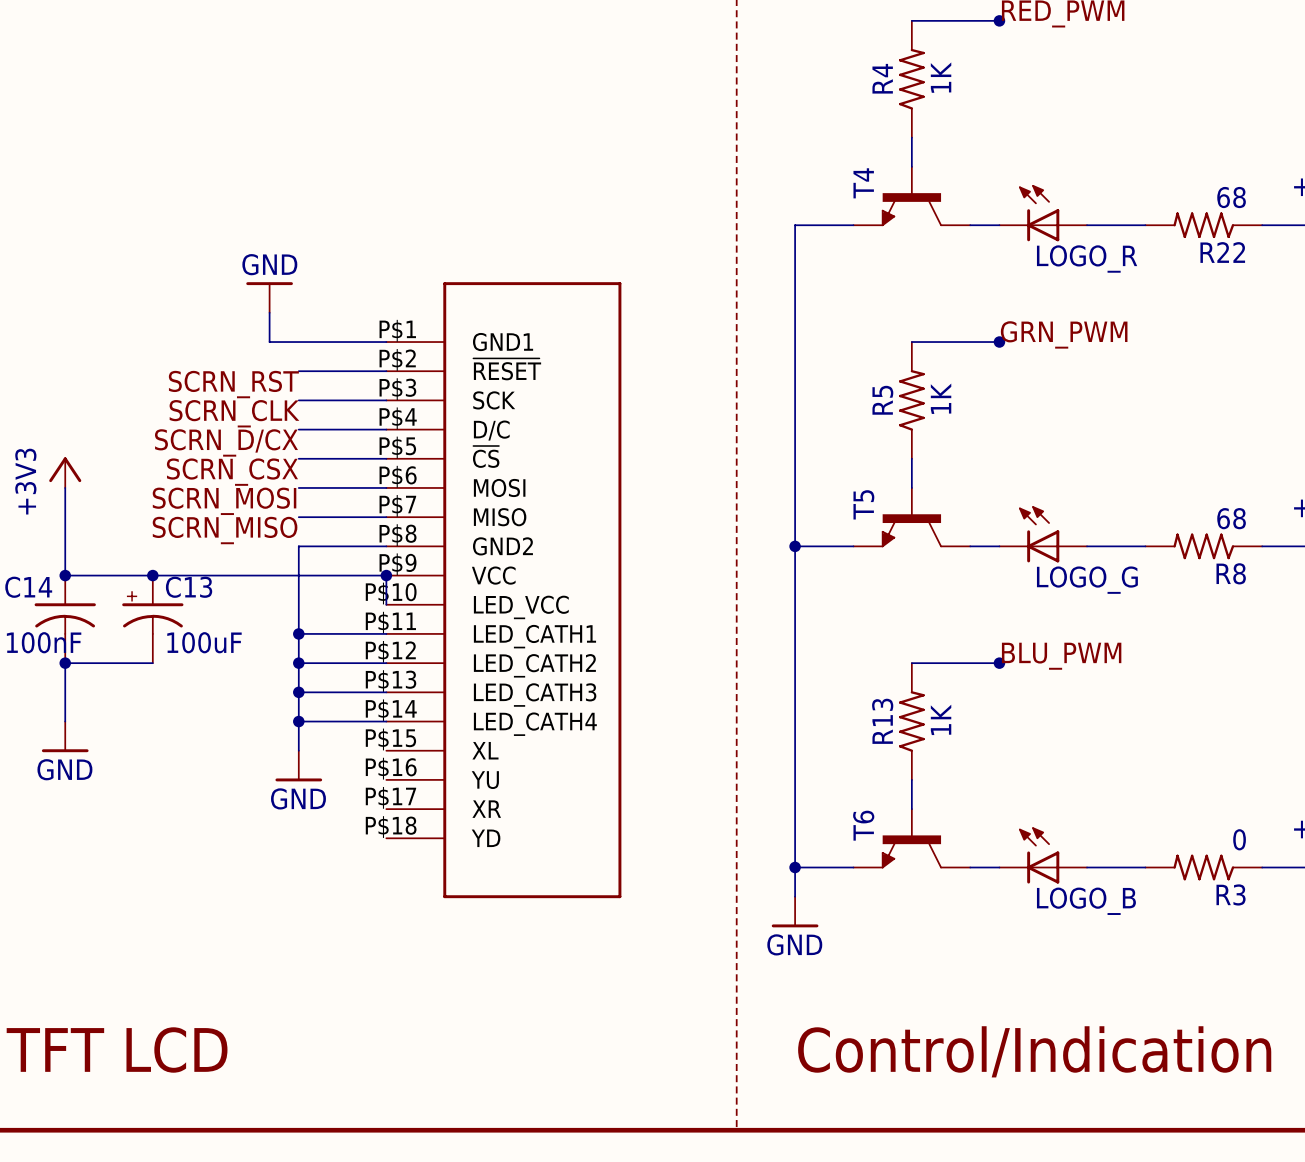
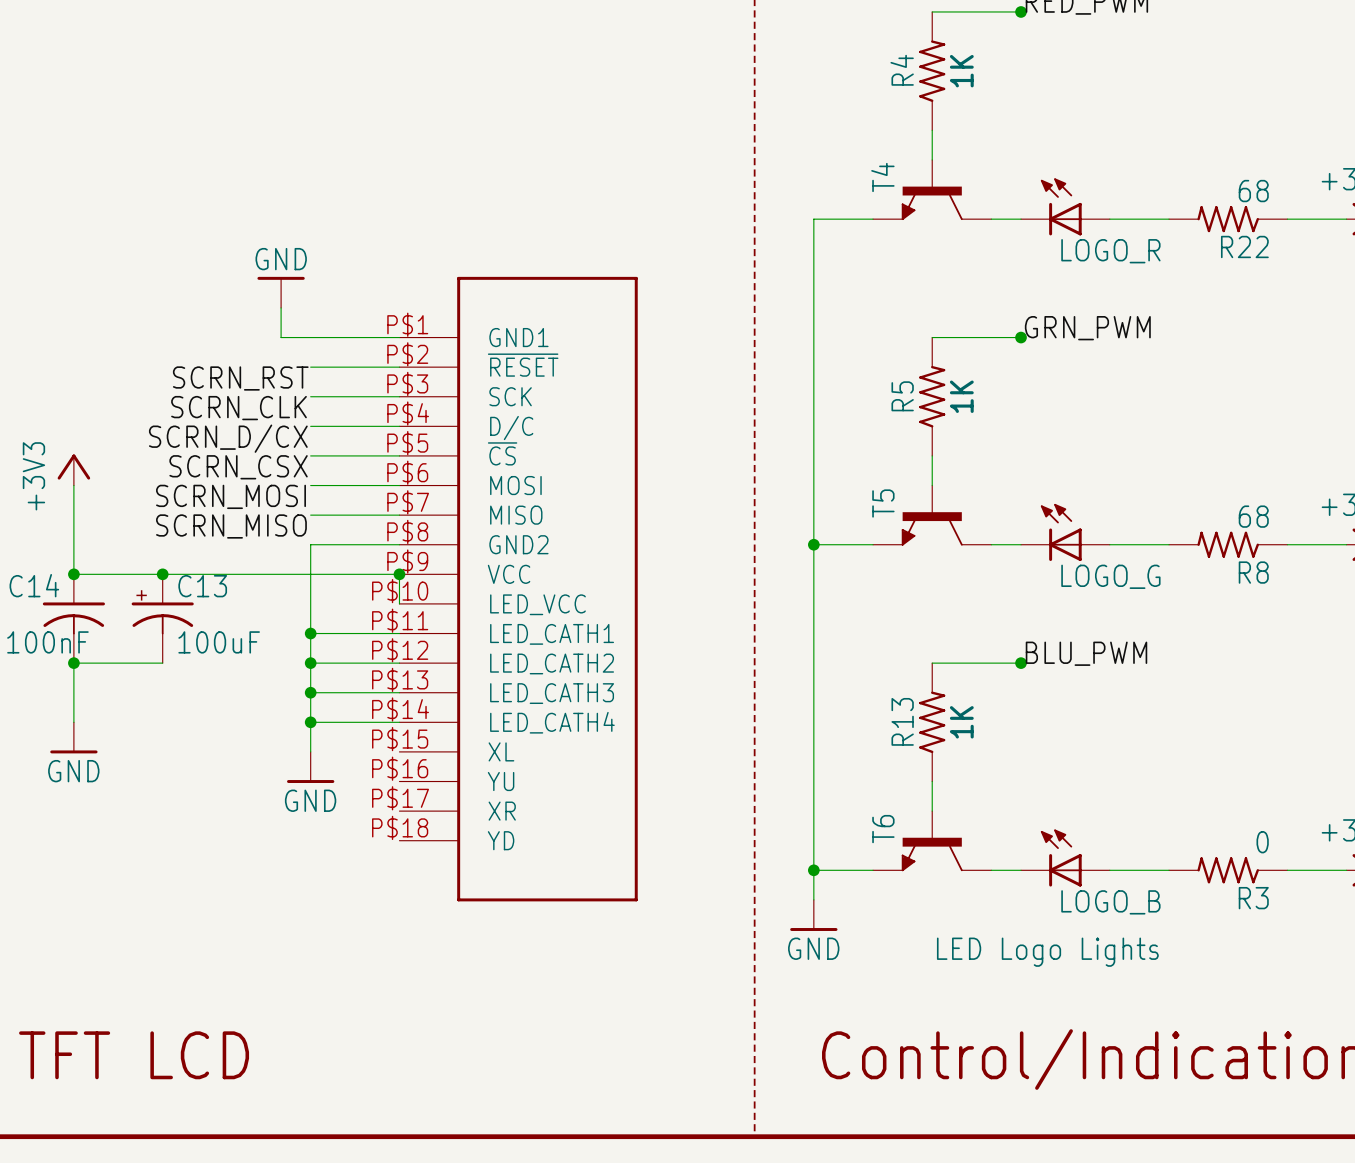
text: none -> LED Logo Lights (1047, 952)

